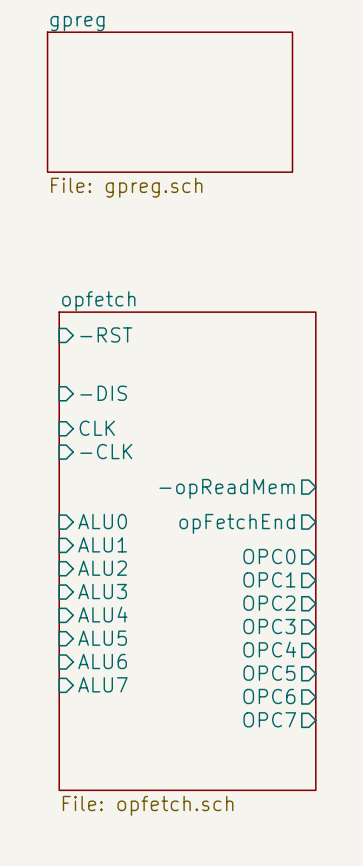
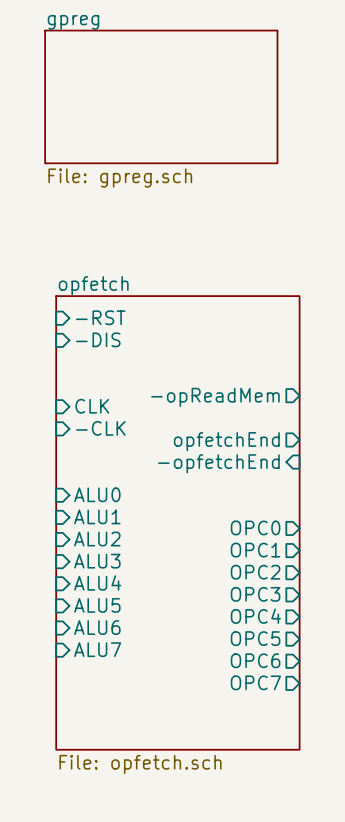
sheet pin position: -DIS (103, 393) -> -DIS (98, 339)
sheet pin: none -> -opReadMem (215, 397)
sheet pin: none -> opfetchEnd (226, 441)
sheet pin shape: output (227, 488) -> input (218, 463)
sheet pin: -opReadMem (227, 488) -> -opfetchEnd (218, 463)
sheet pin: opFetchEnd (237, 523) -> none

